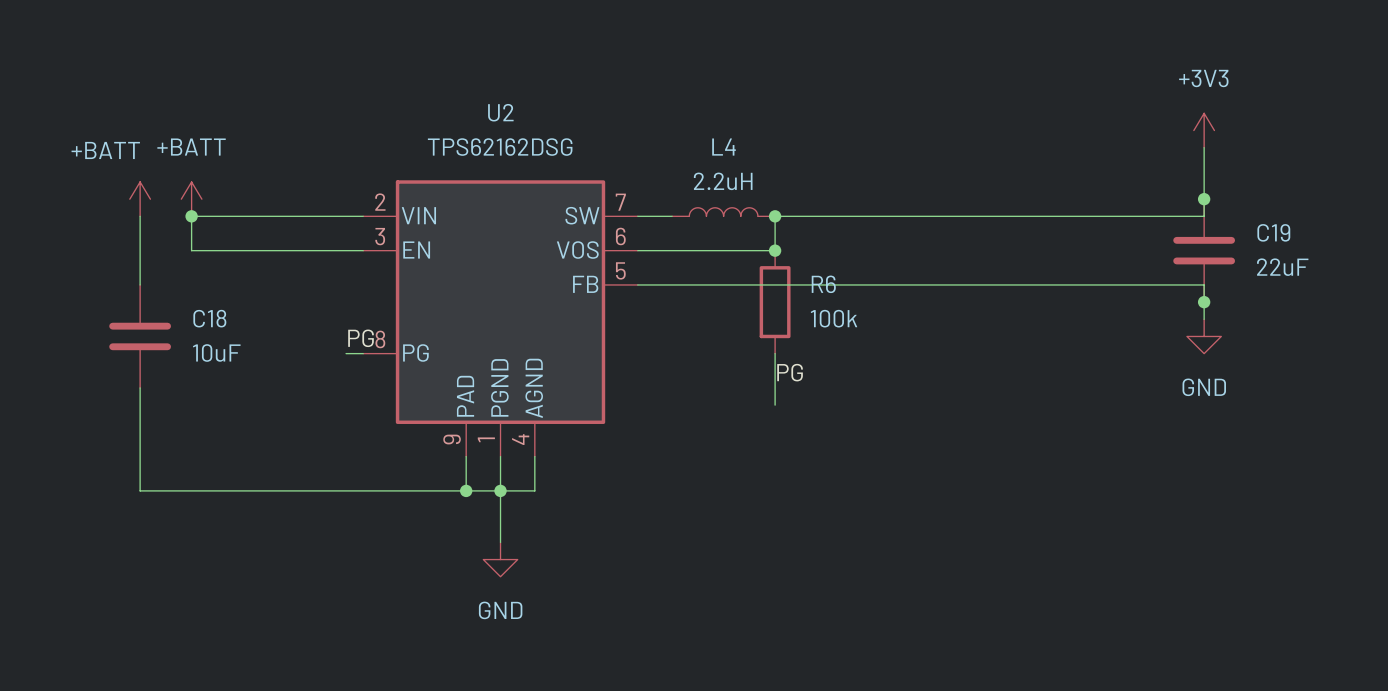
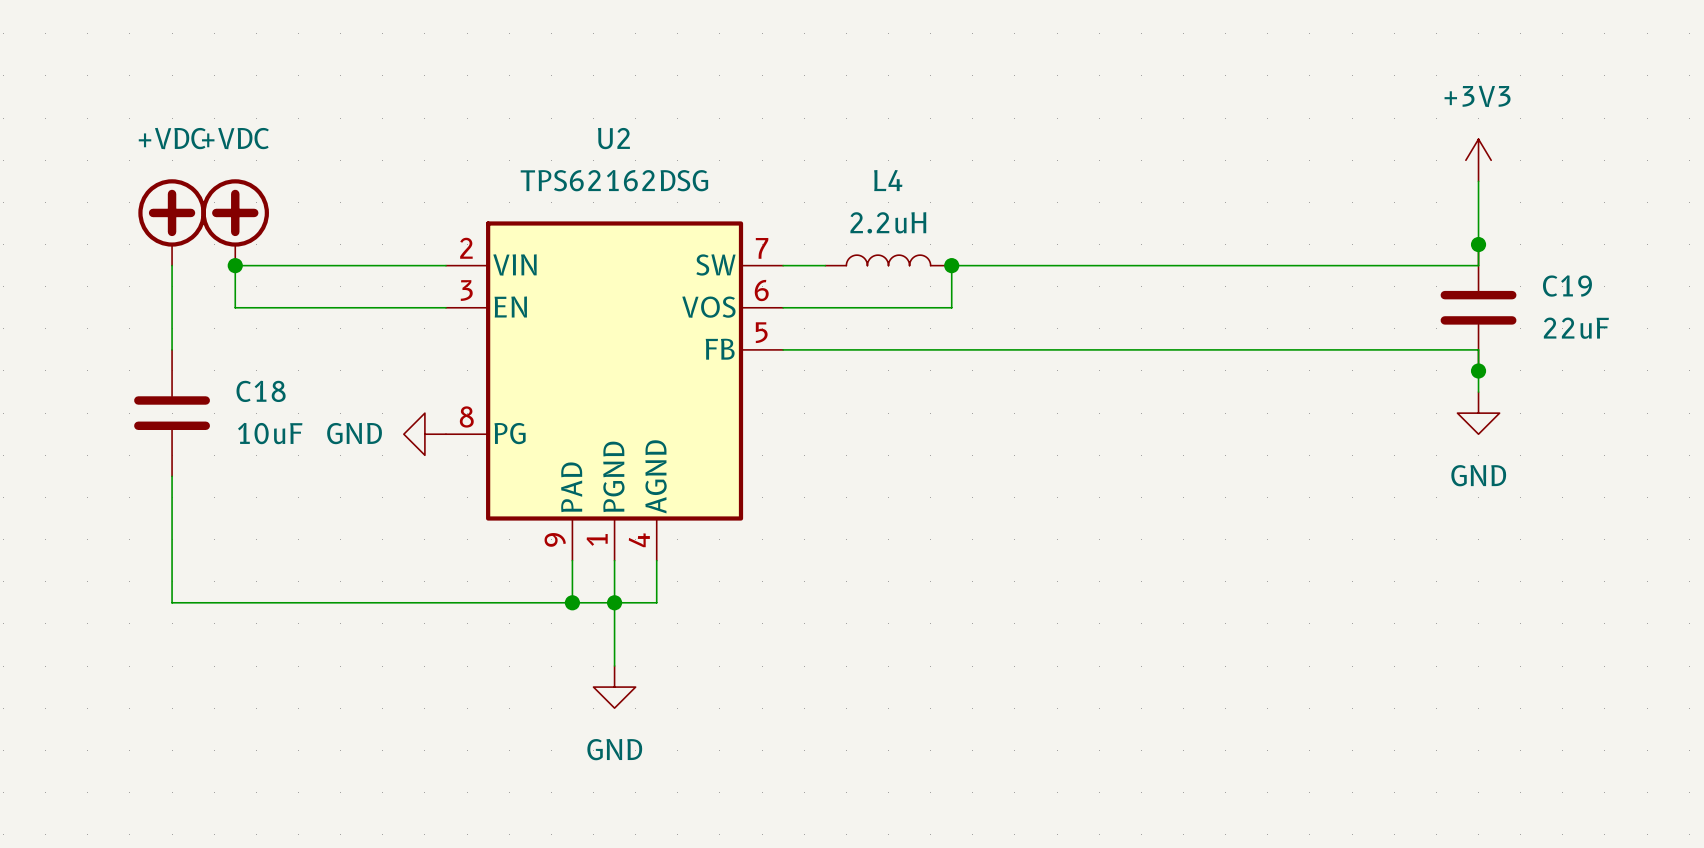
power symbol: none -> +VDC (172, 222)
power symbol: none -> +VDC (235, 222)
power symbol: +BATT (140, 199) -> none
power symbol: +BATT (191, 199) -> none
junction: (775, 250) -> none
R6: 100k (775, 302) -> none
label: PG (361, 338) -> none
power symbol: none -> GND (424, 434)
wire: (775, 353) (775, 405) -> none
label: PG (790, 372) -> none

